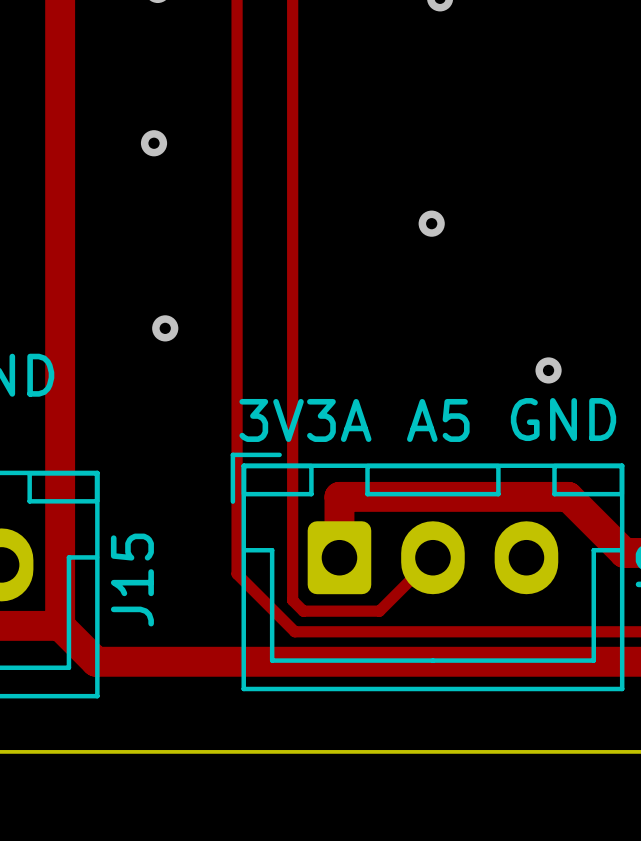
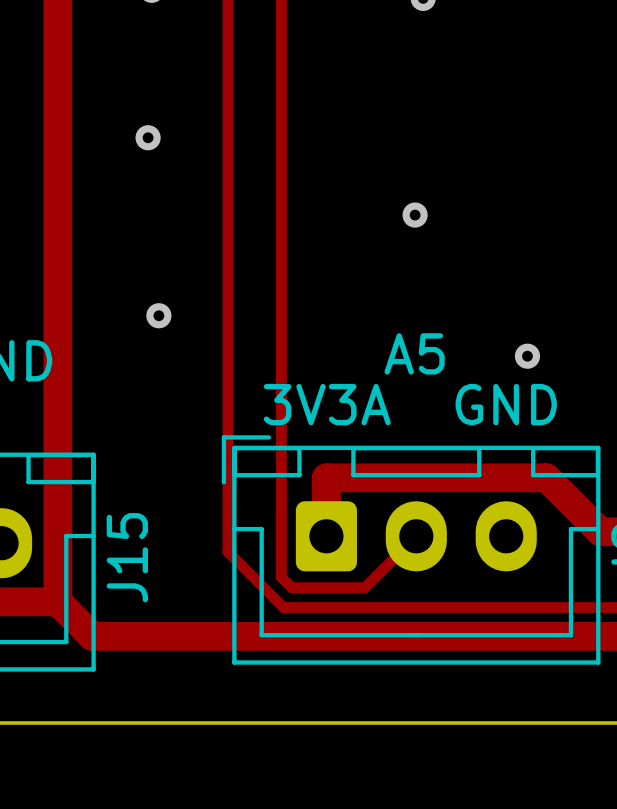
text position: GND (563, 419) -> GND (506, 404)
text position: 3V3A (305, 420) -> 3V3A (327, 404)
text position: A5 (438, 420) -> A5 (414, 353)

